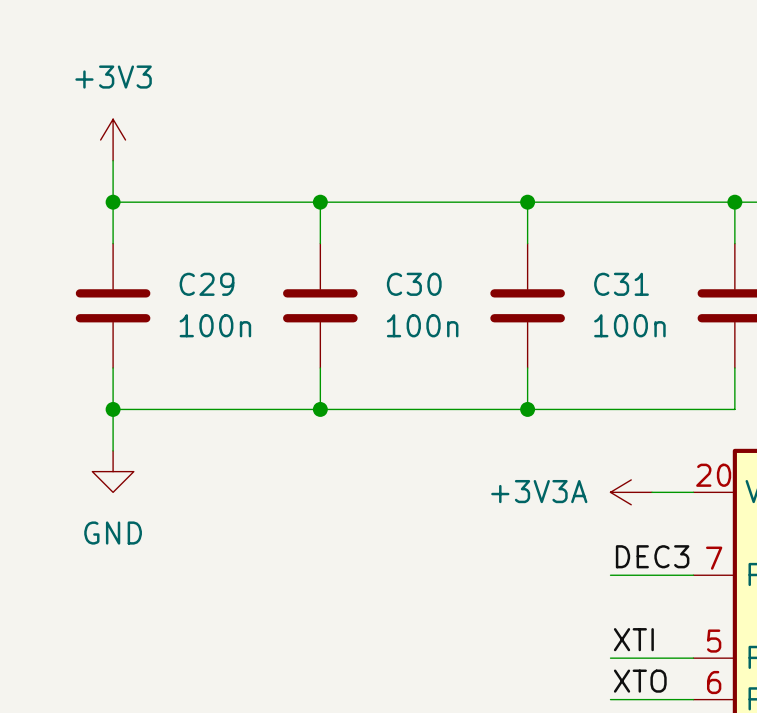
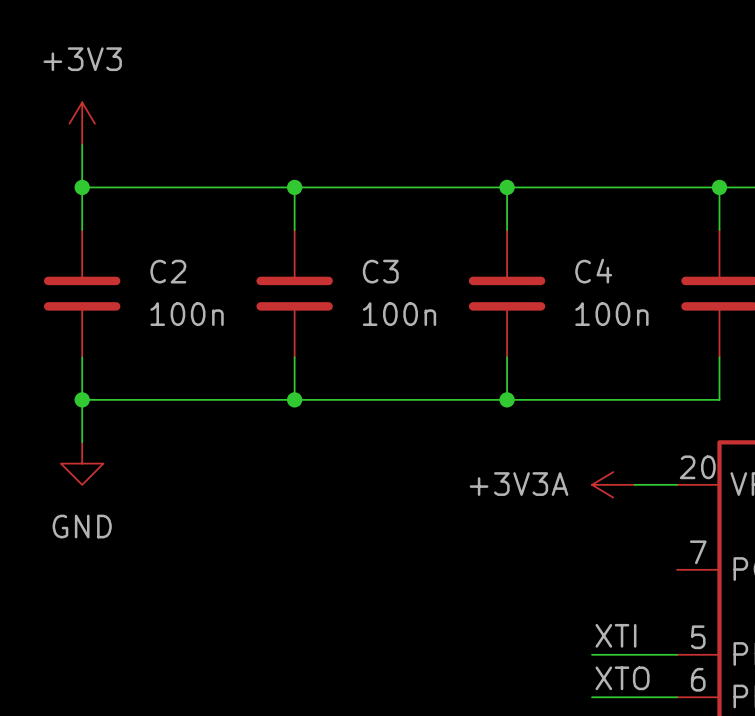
C29 name: C29 (207, 284) -> C2 (168, 271)
C30 name: C30 (414, 284) -> C3 (380, 271)
C31 name: C31 (621, 284) -> C4 (593, 271)
label: DEC3 (652, 556) -> none
wire: (610, 575) (693, 575) -> none

